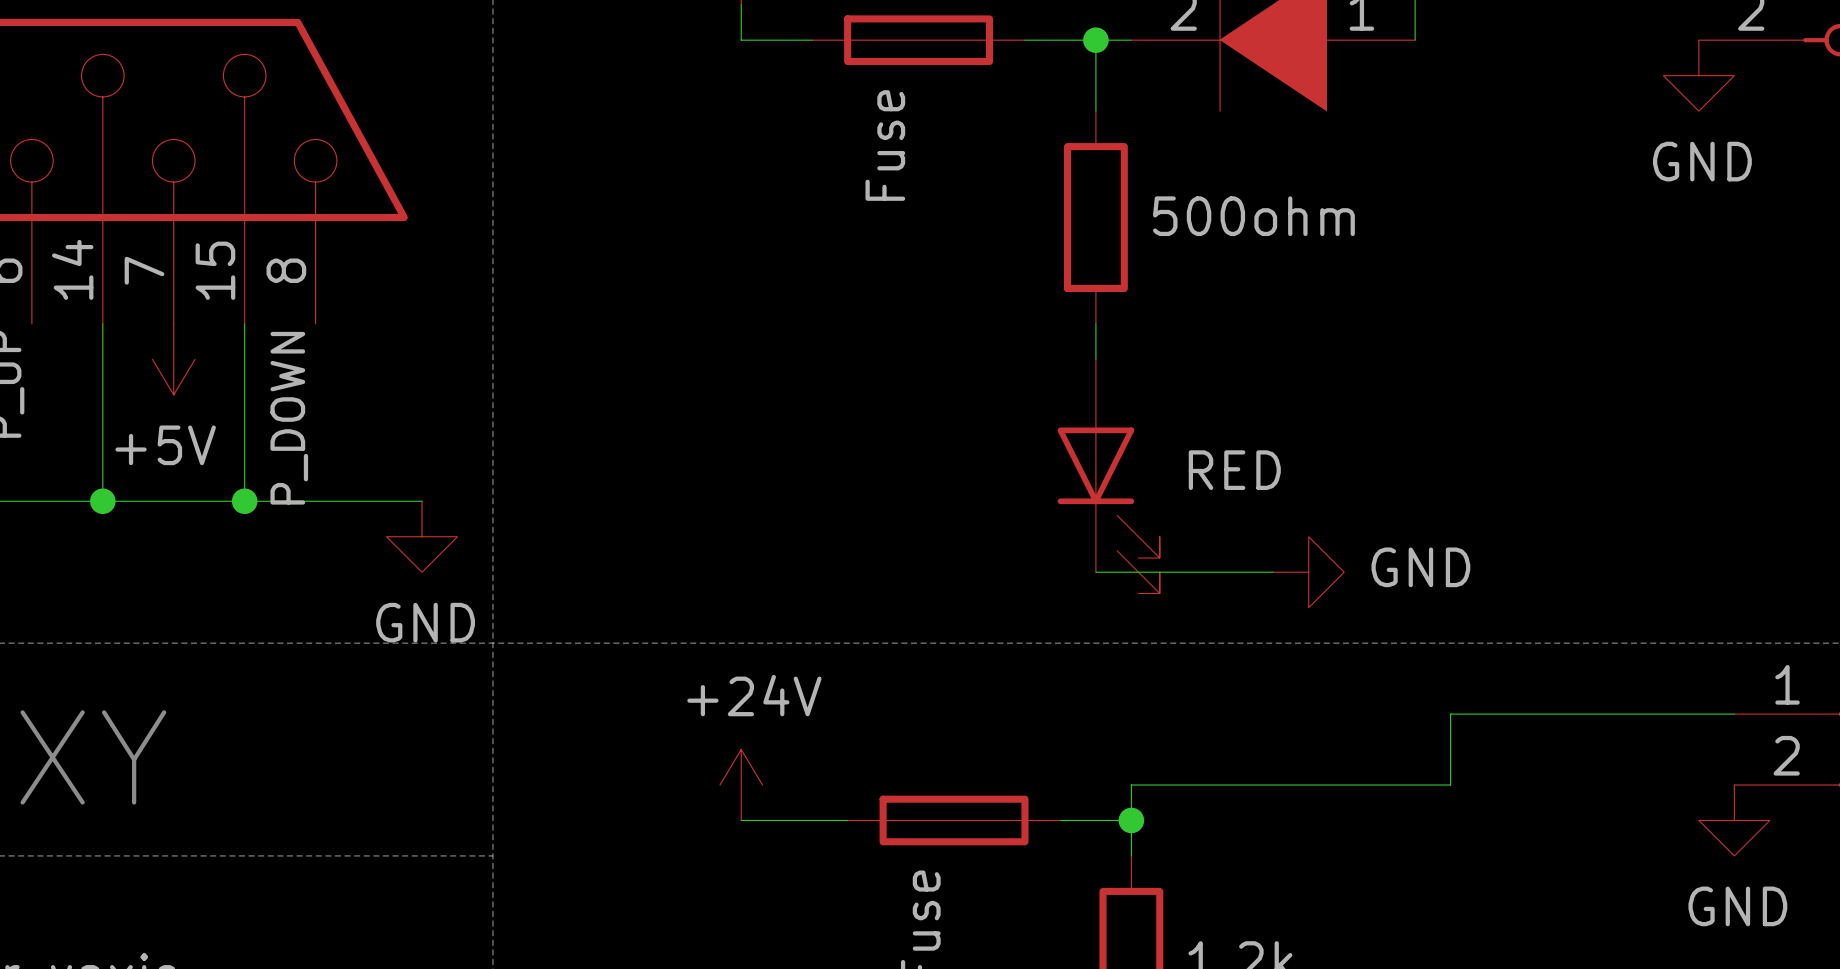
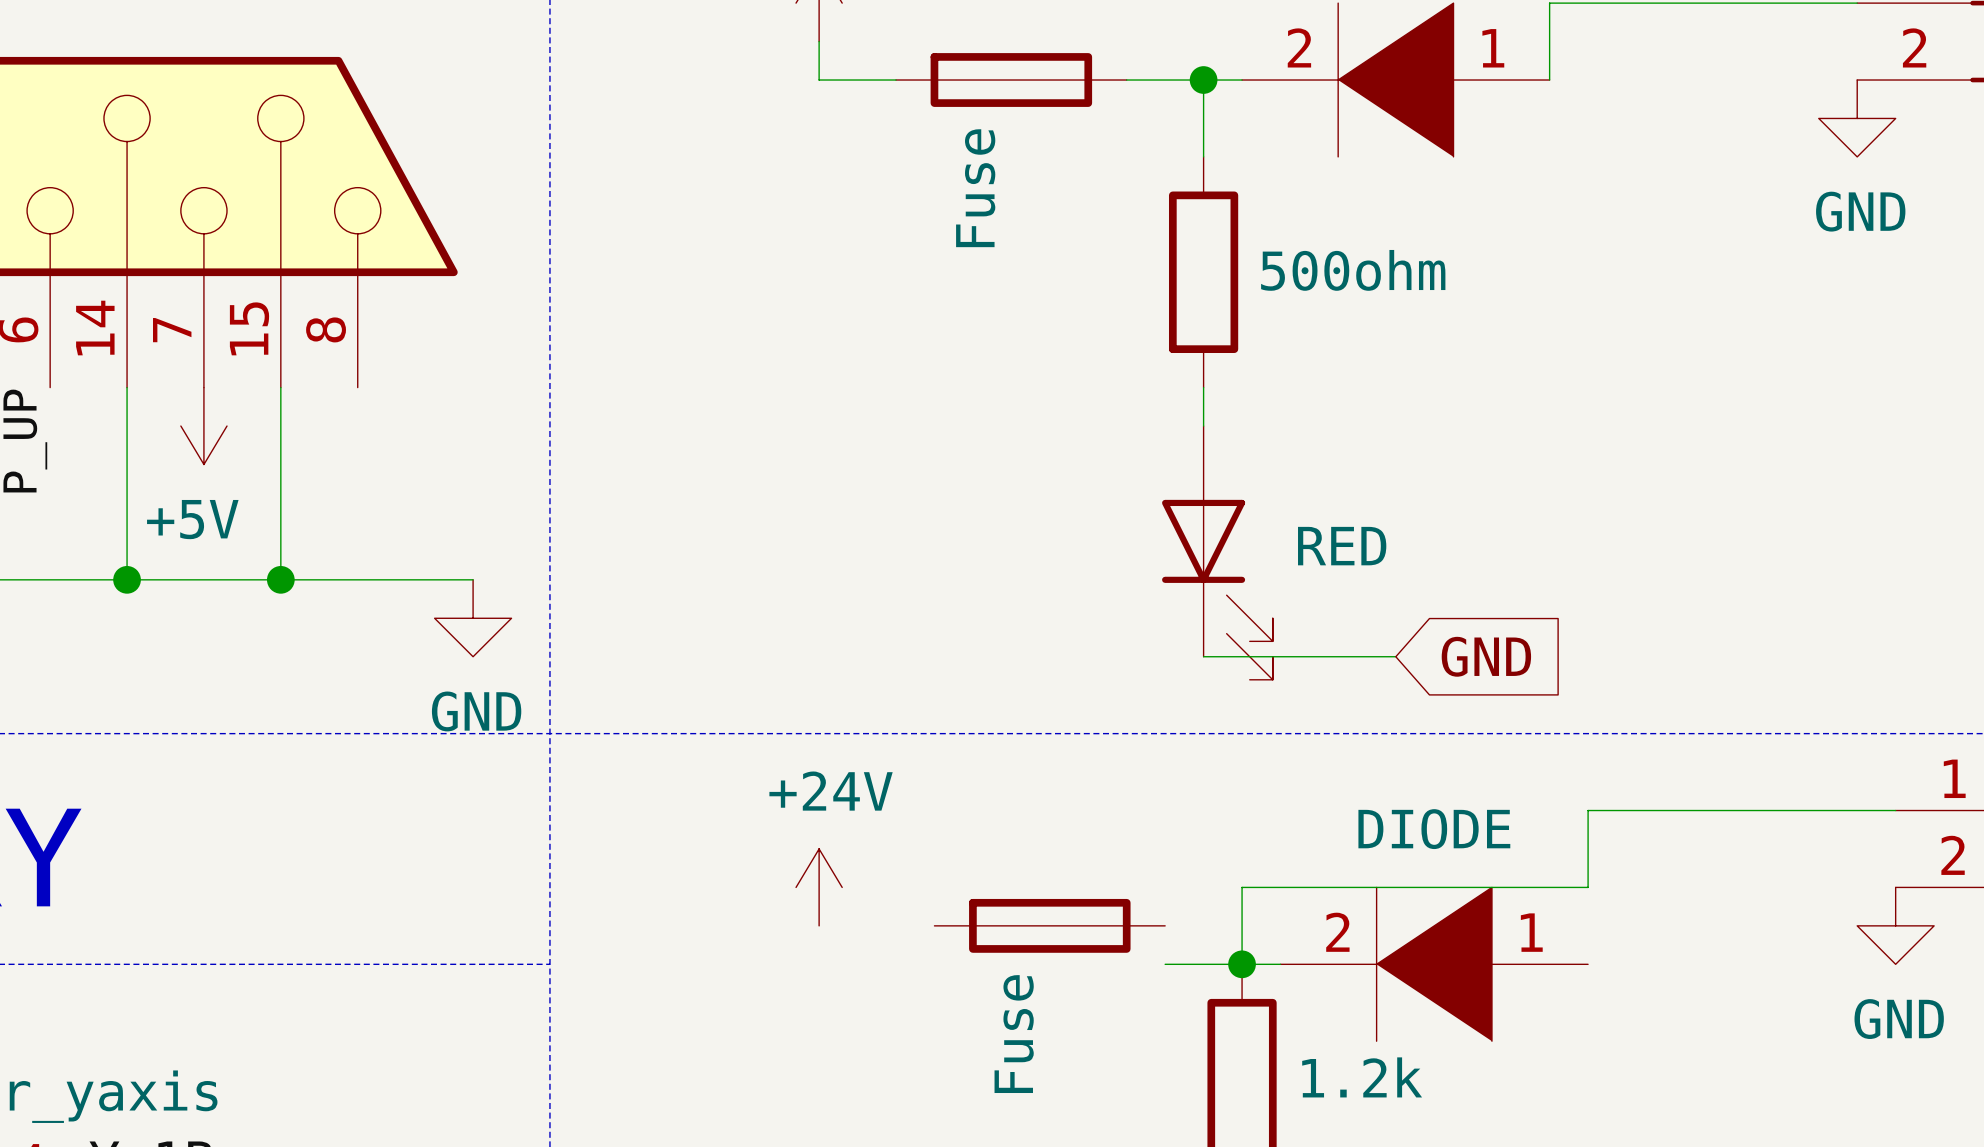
label: P_DOWN (289, 418) -> none
power symbol: GND (1308, 572) -> none
global label: none -> GND (1486, 656)
wire: (741, 820) (847, 820) -> (1165, 964) (1280, 964)
wire: (1060, 820) (1131, 820) -> none
junction position: (1131, 820) -> (1242, 964)
part: none -> DIODE (1434, 964)

